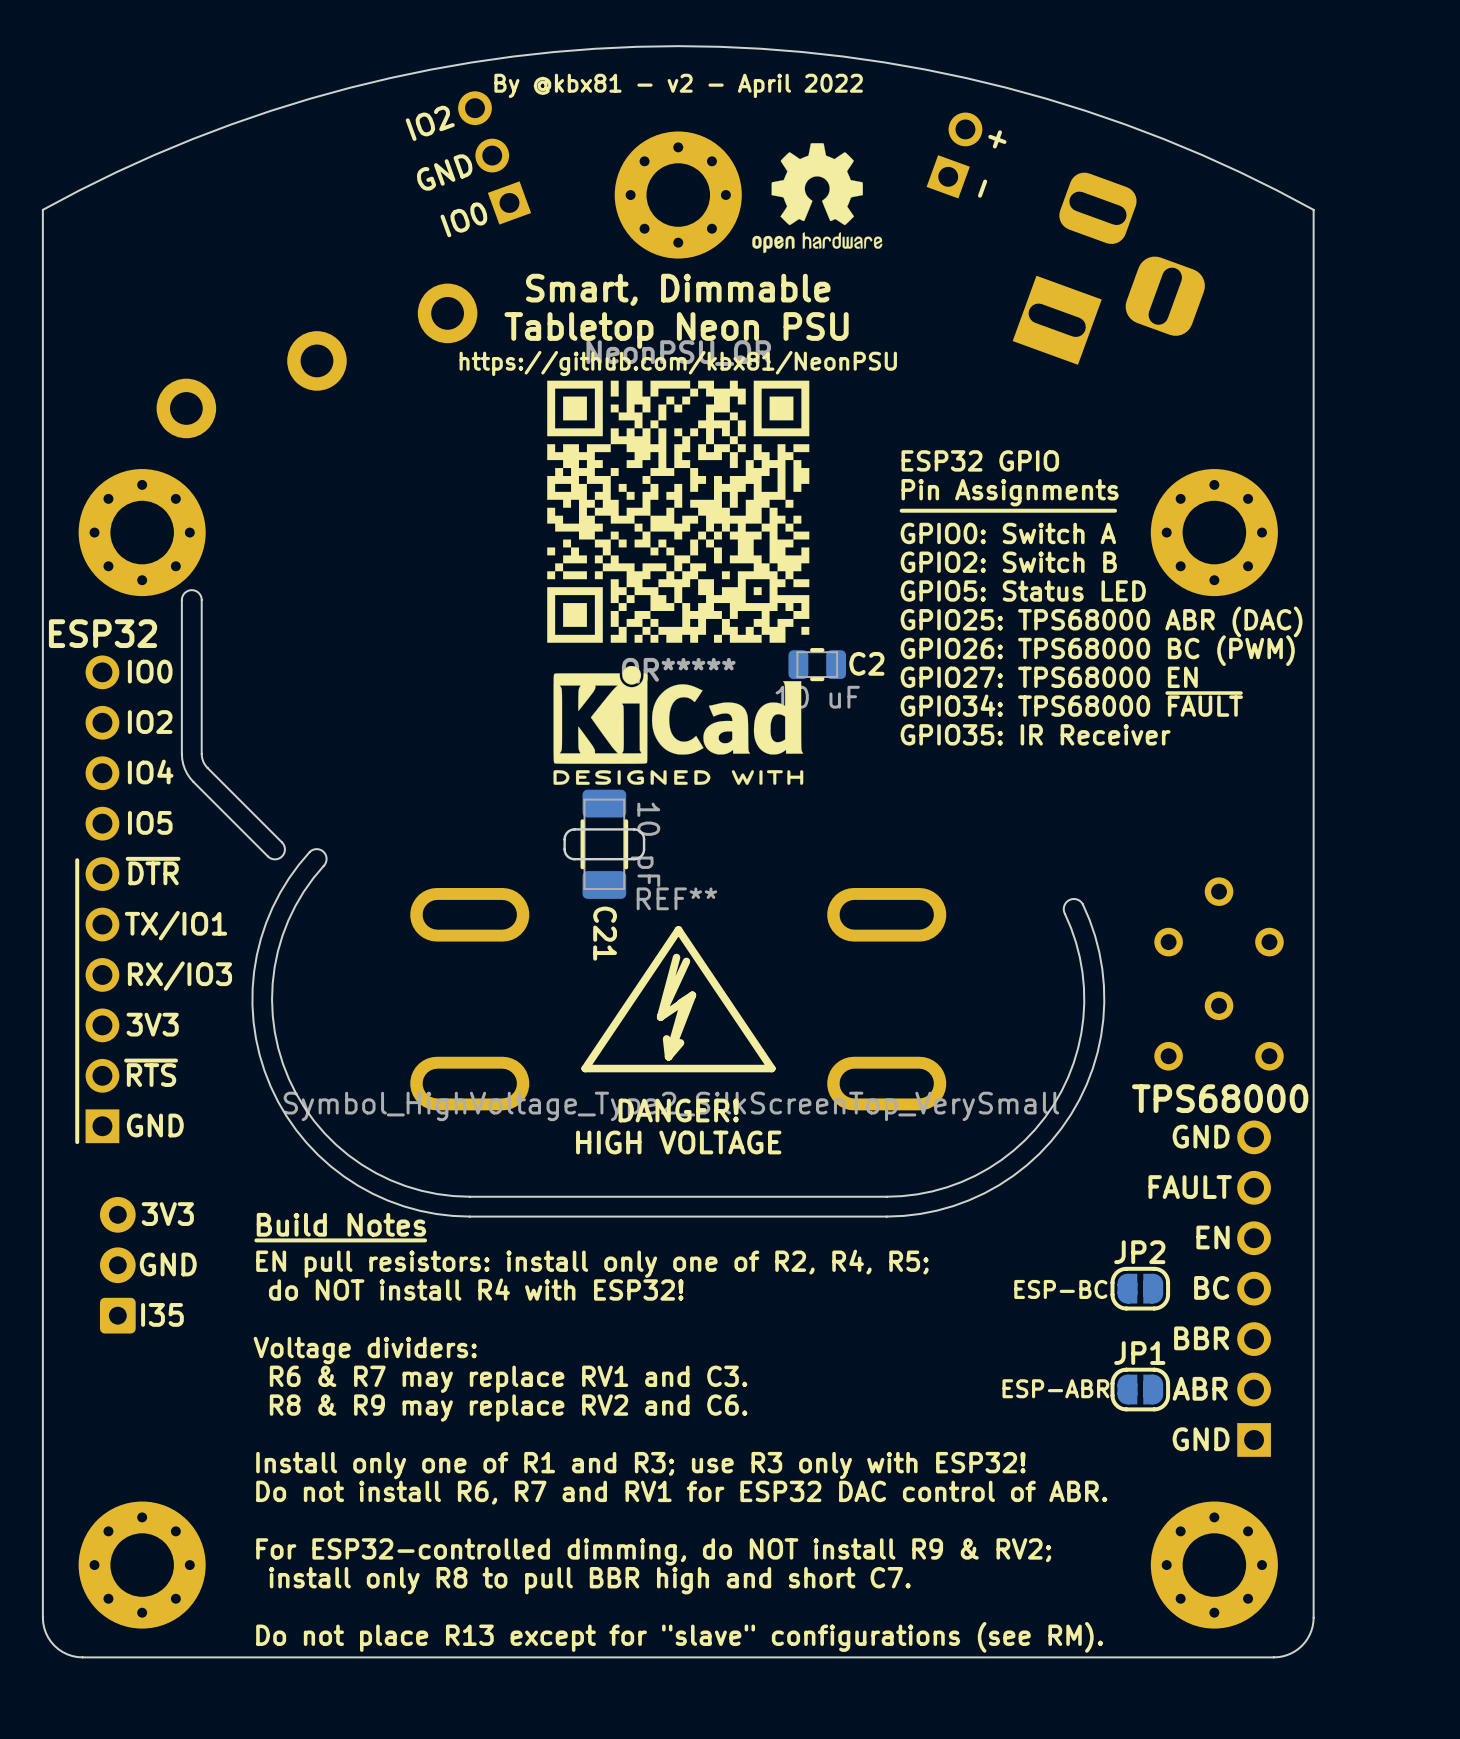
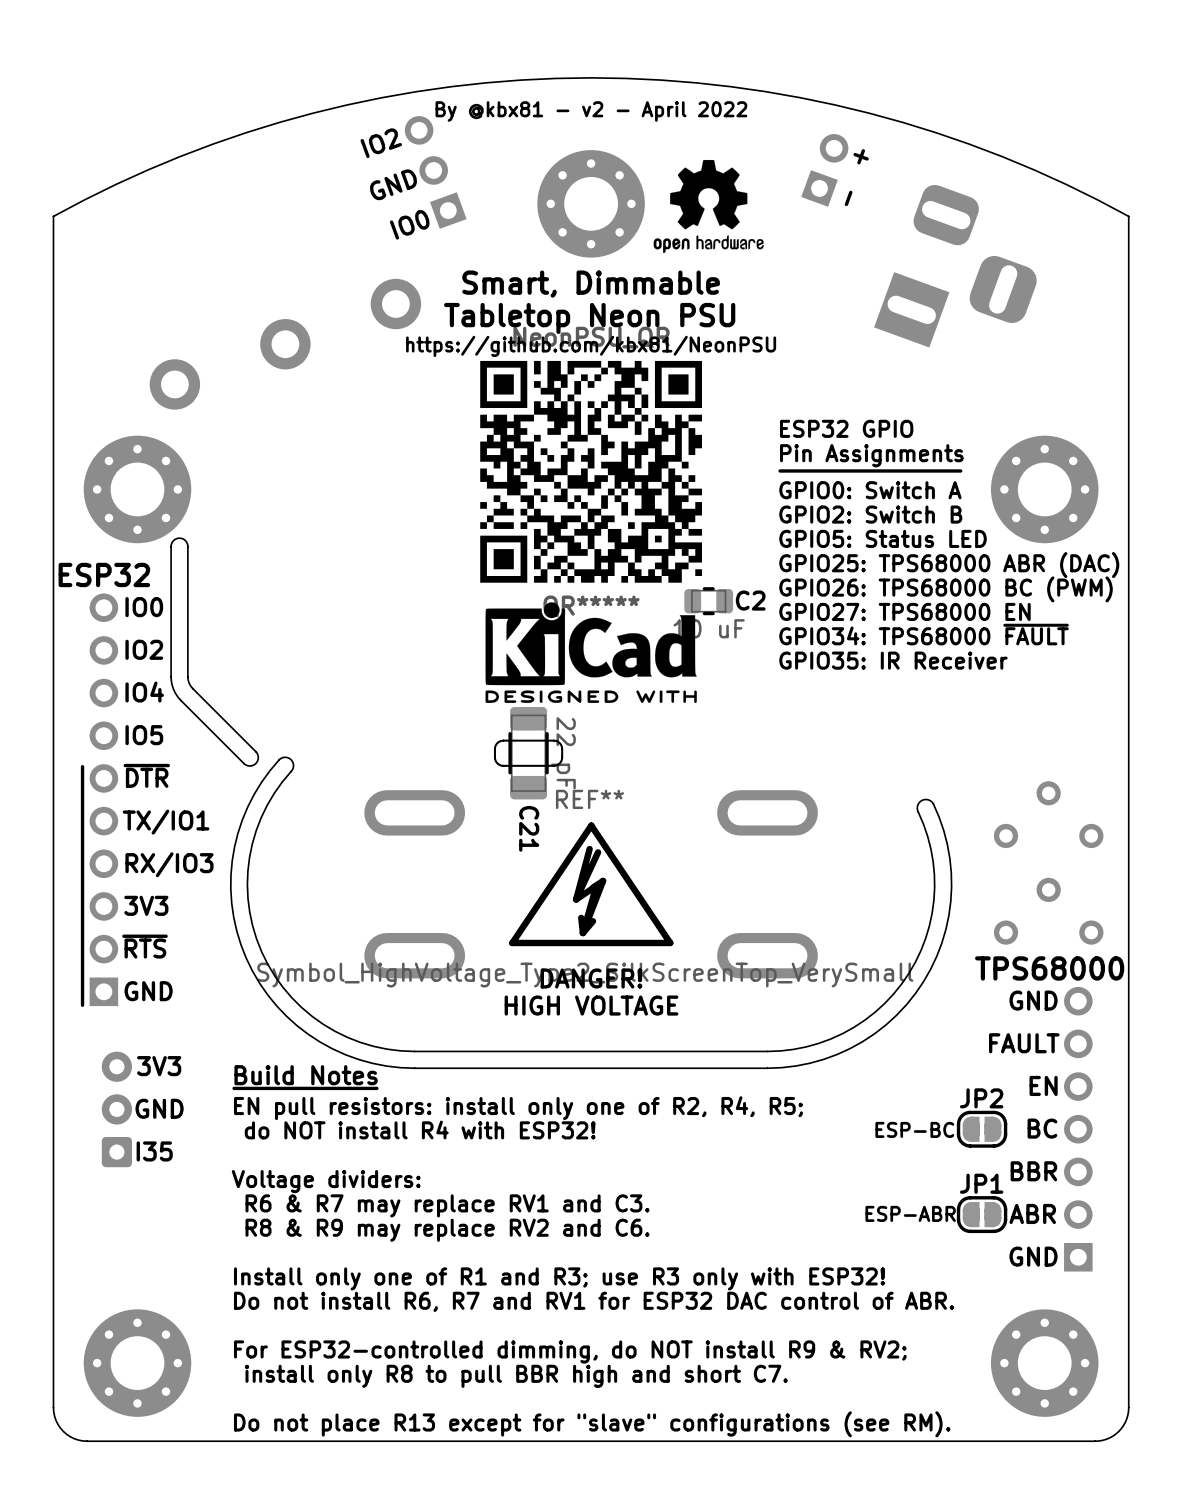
C21 value: 10 pF (645, 844) -> 22 pF (563, 753)

